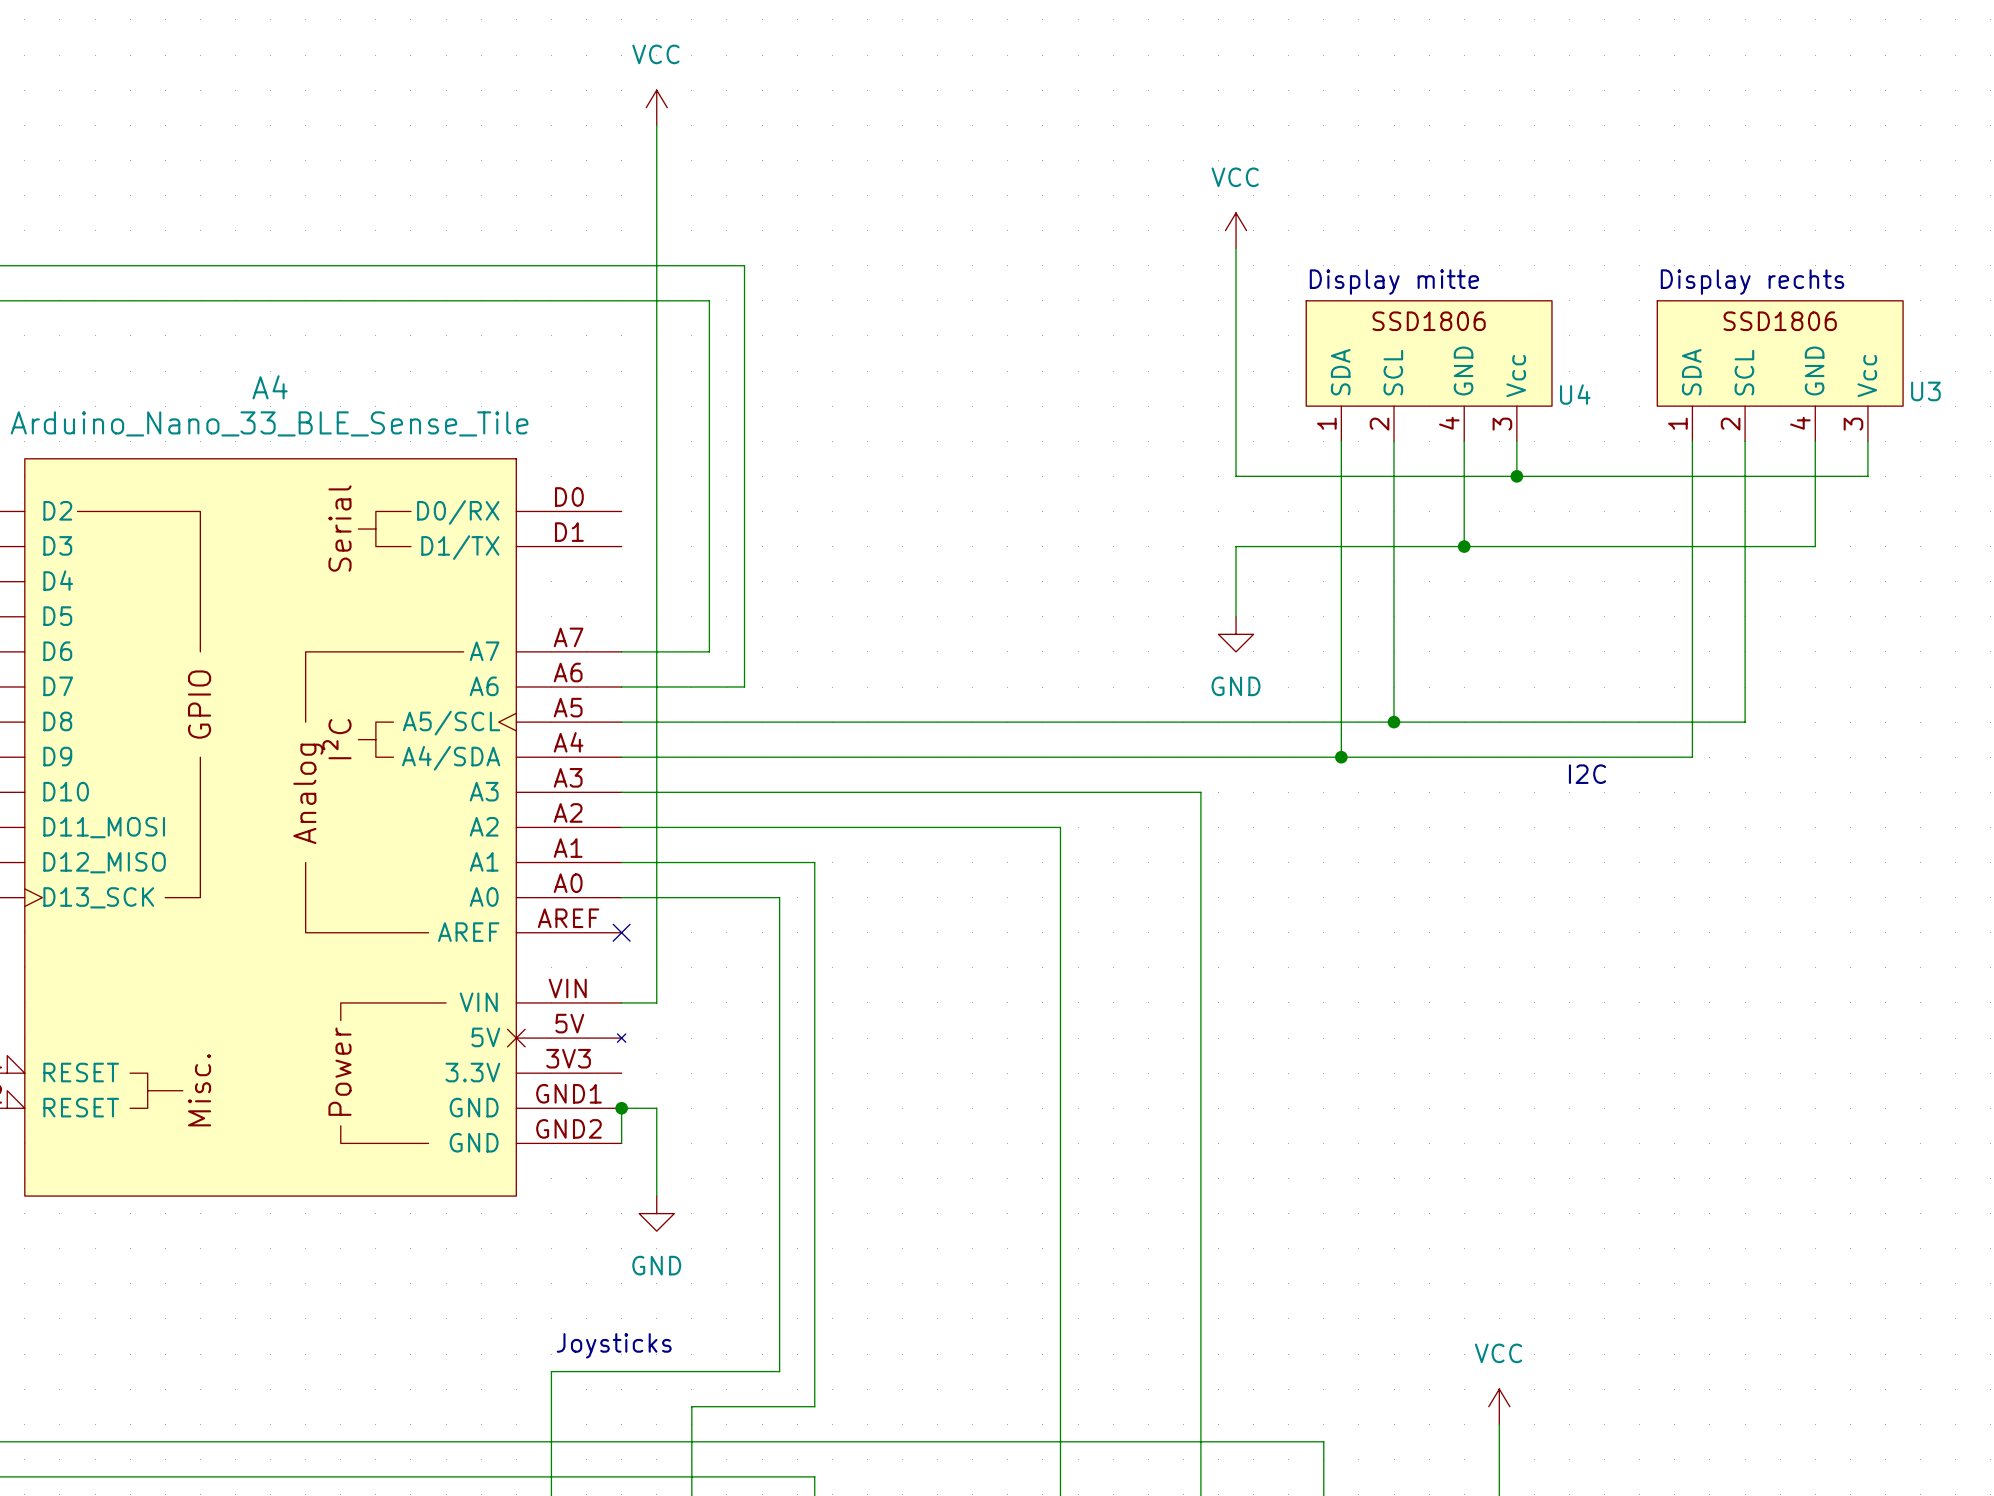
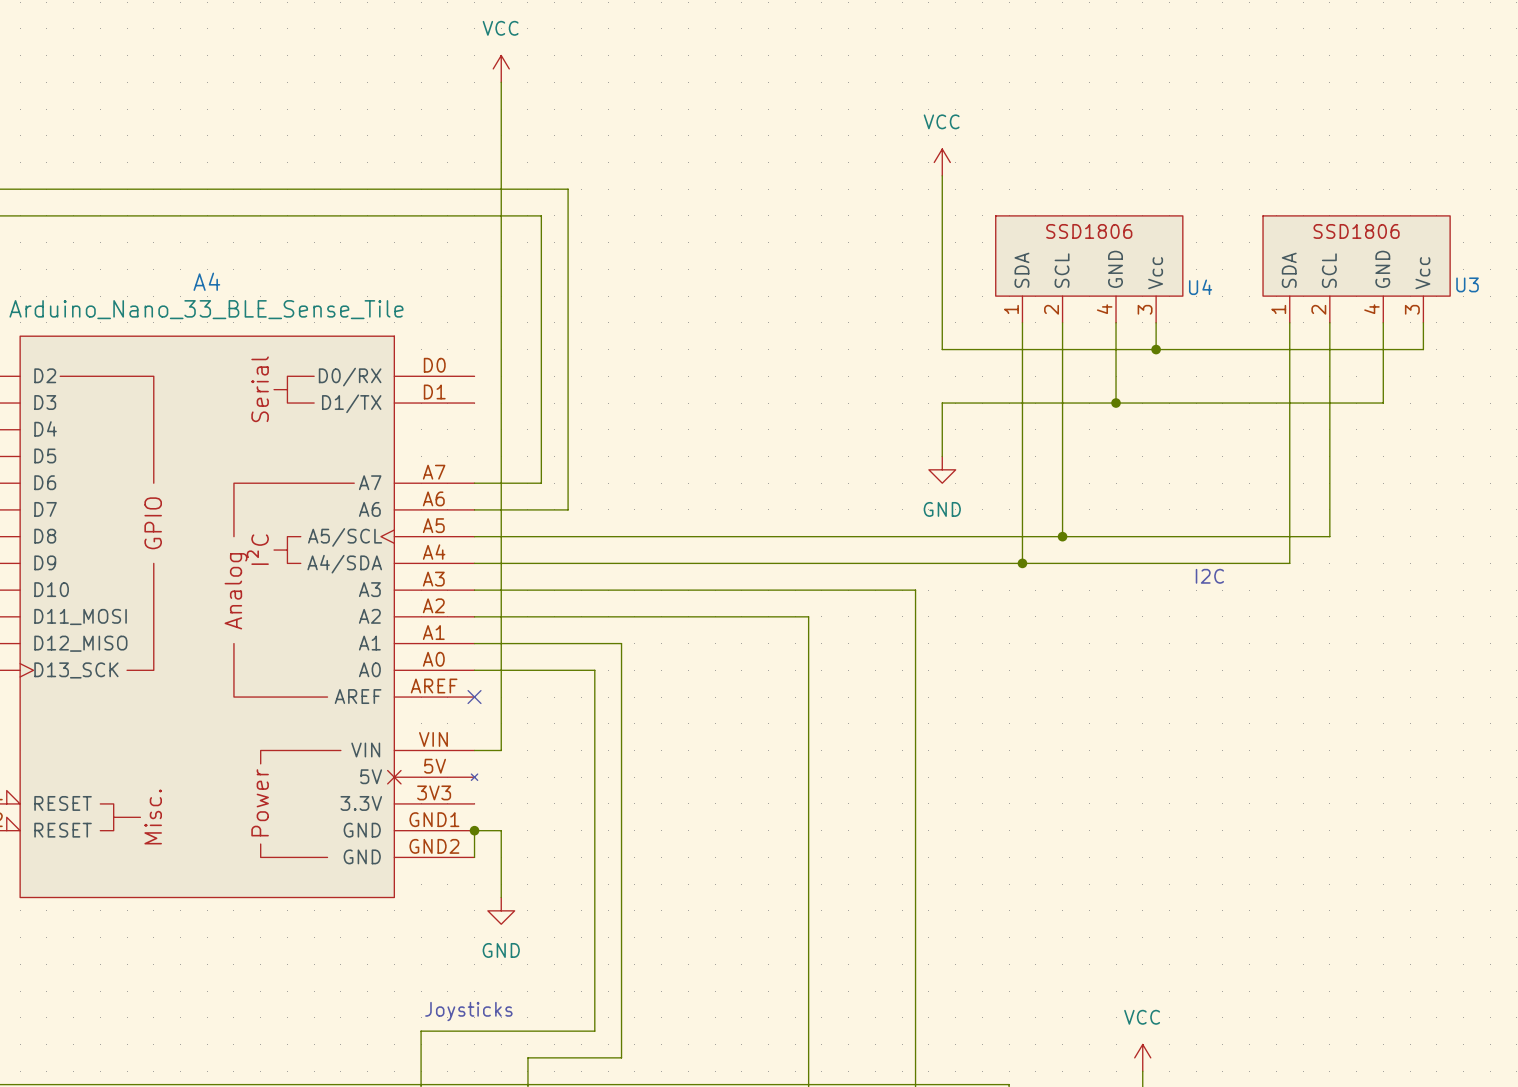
text: Display mitte (1394, 282) -> none
text: Display rechts (1752, 282) -> none

